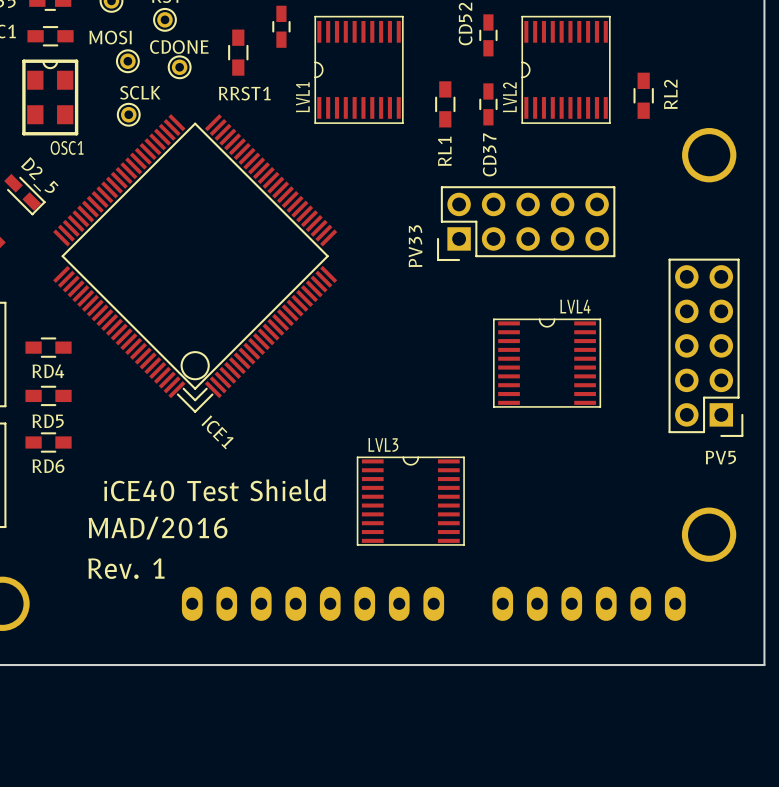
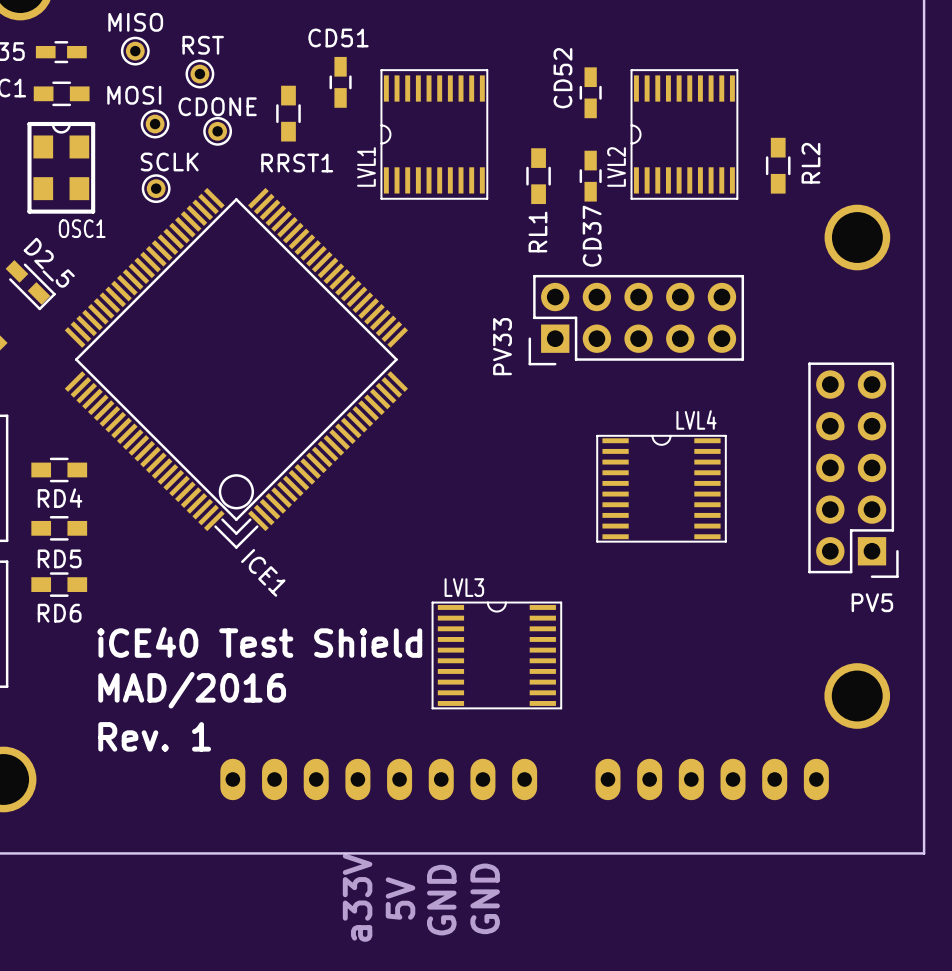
text: none -> a33V (357, 897)
text: none -> 5V (400, 898)
text: none -> GND (485, 898)
text: none -> GND (441, 900)

